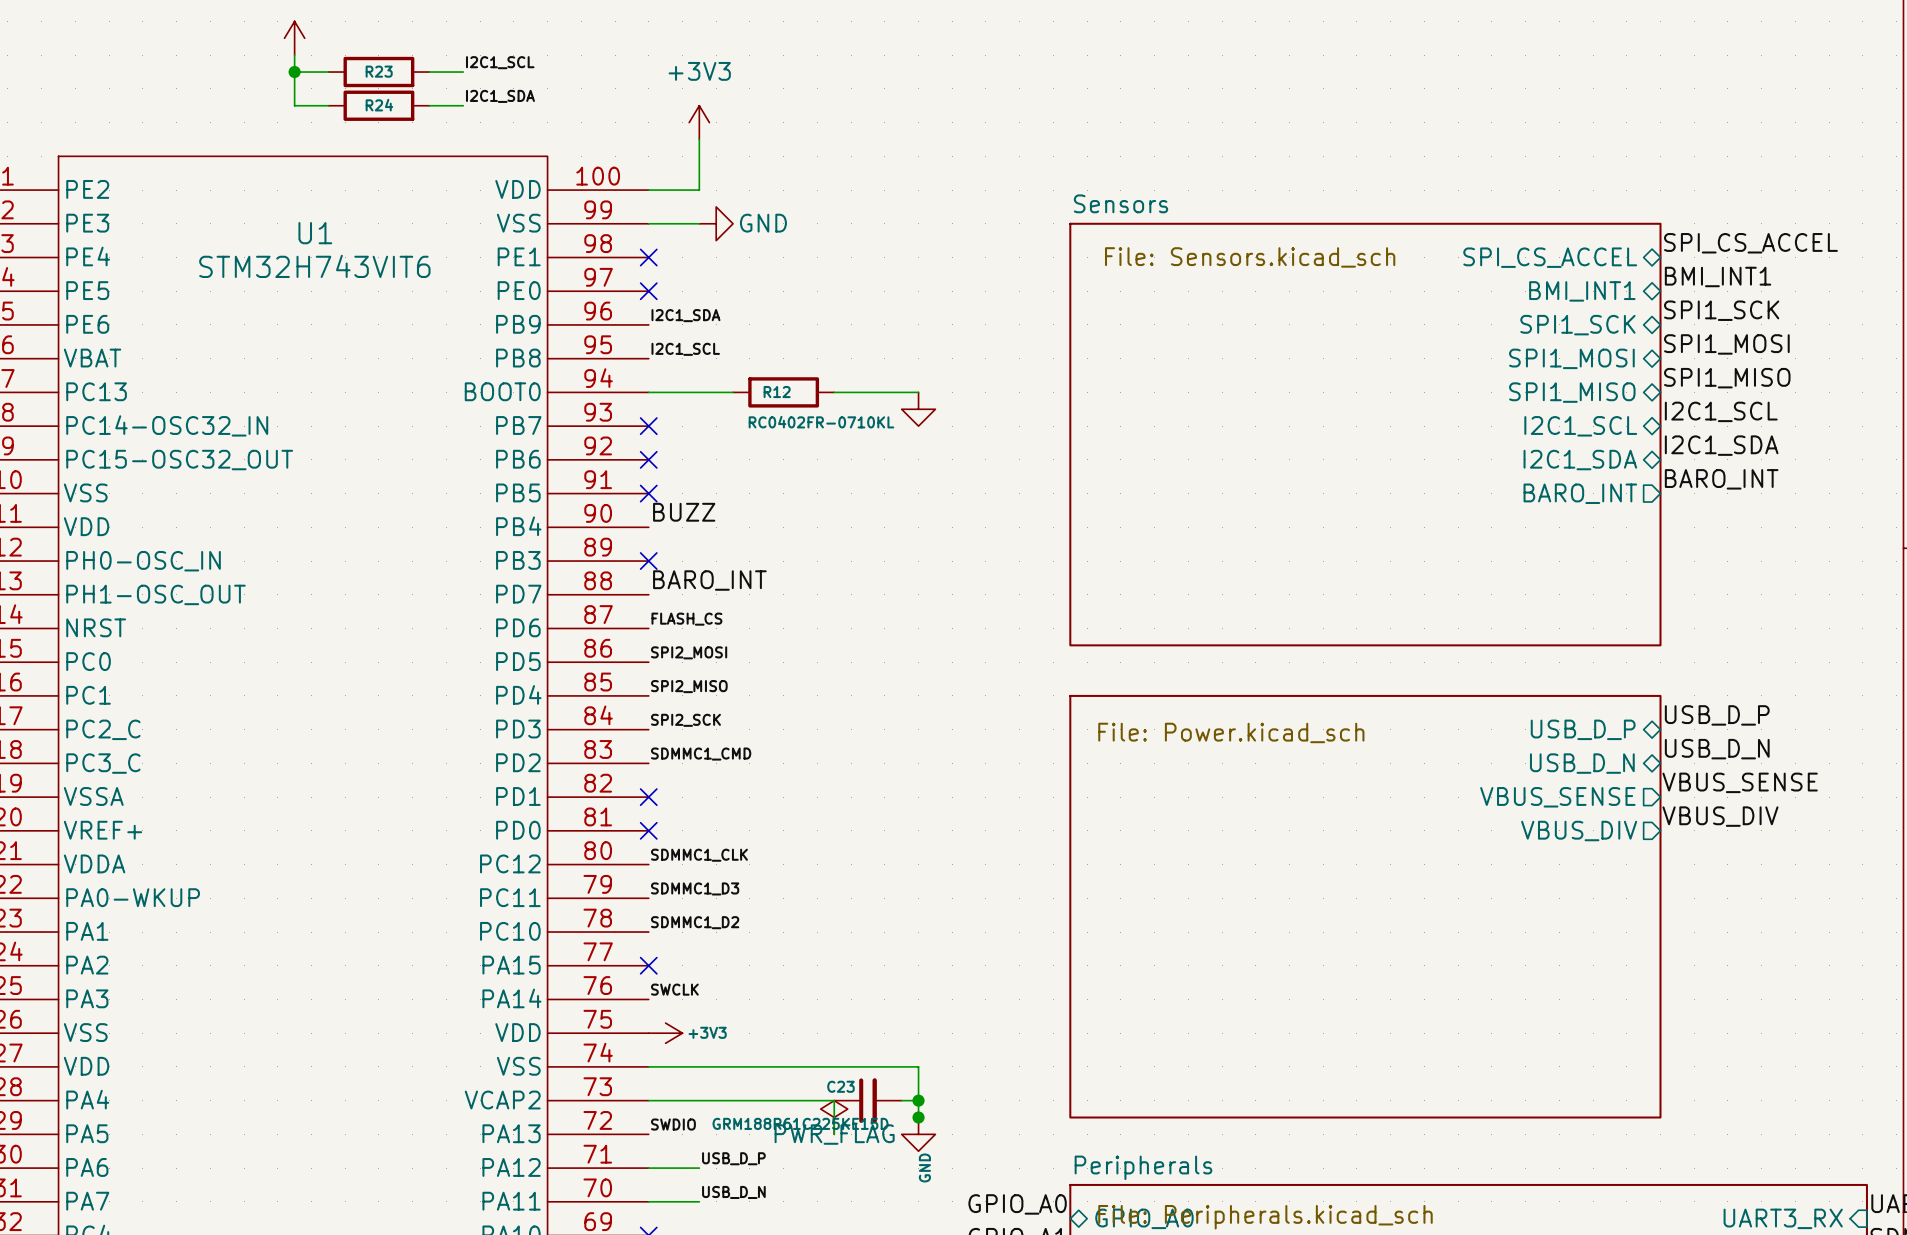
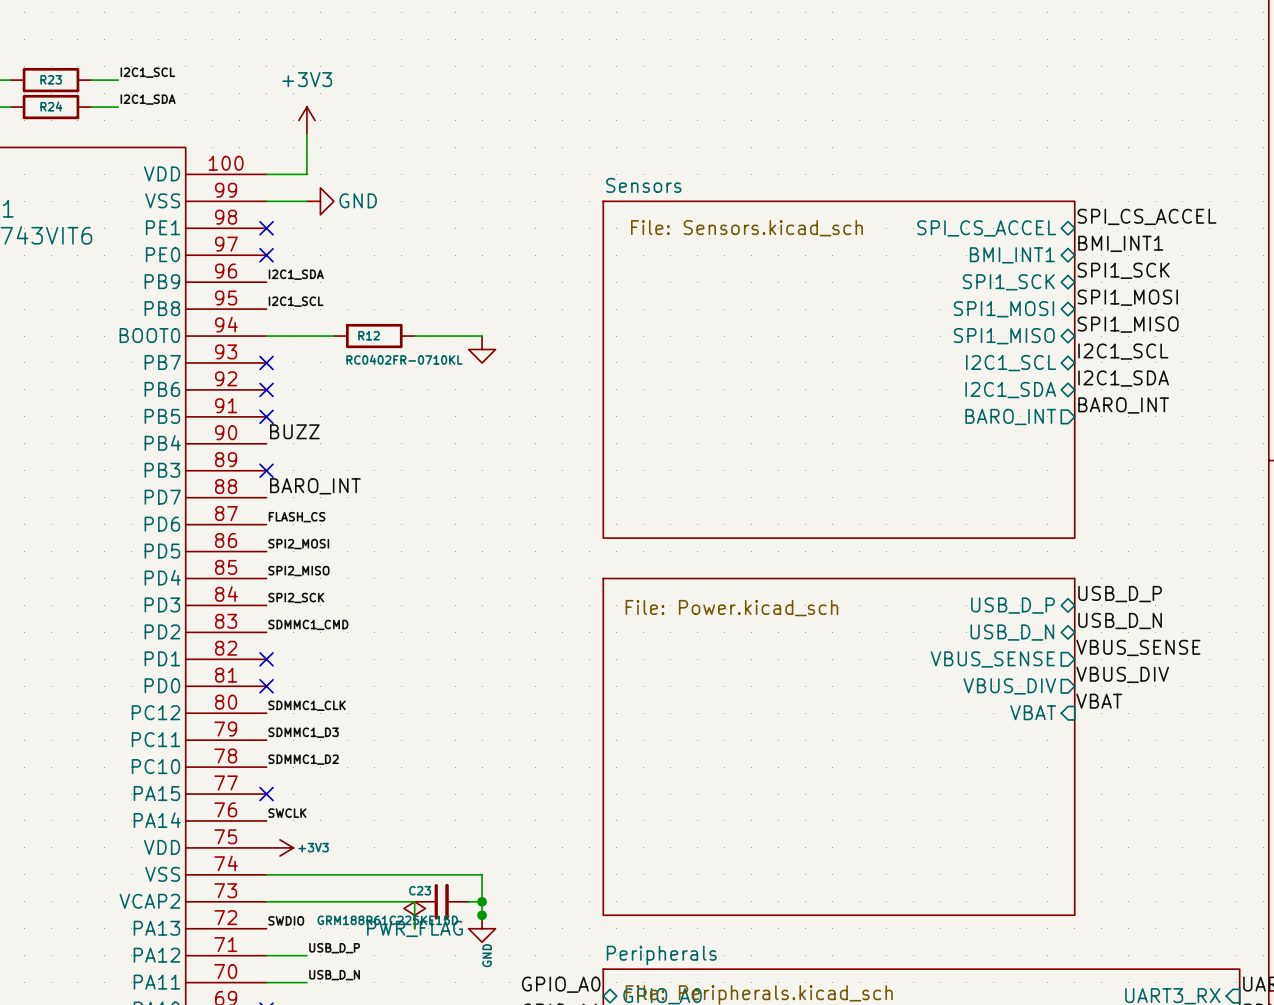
label: none -> VBAT (1099, 701)
sheet pin: none -> VBAT (1033, 712)

